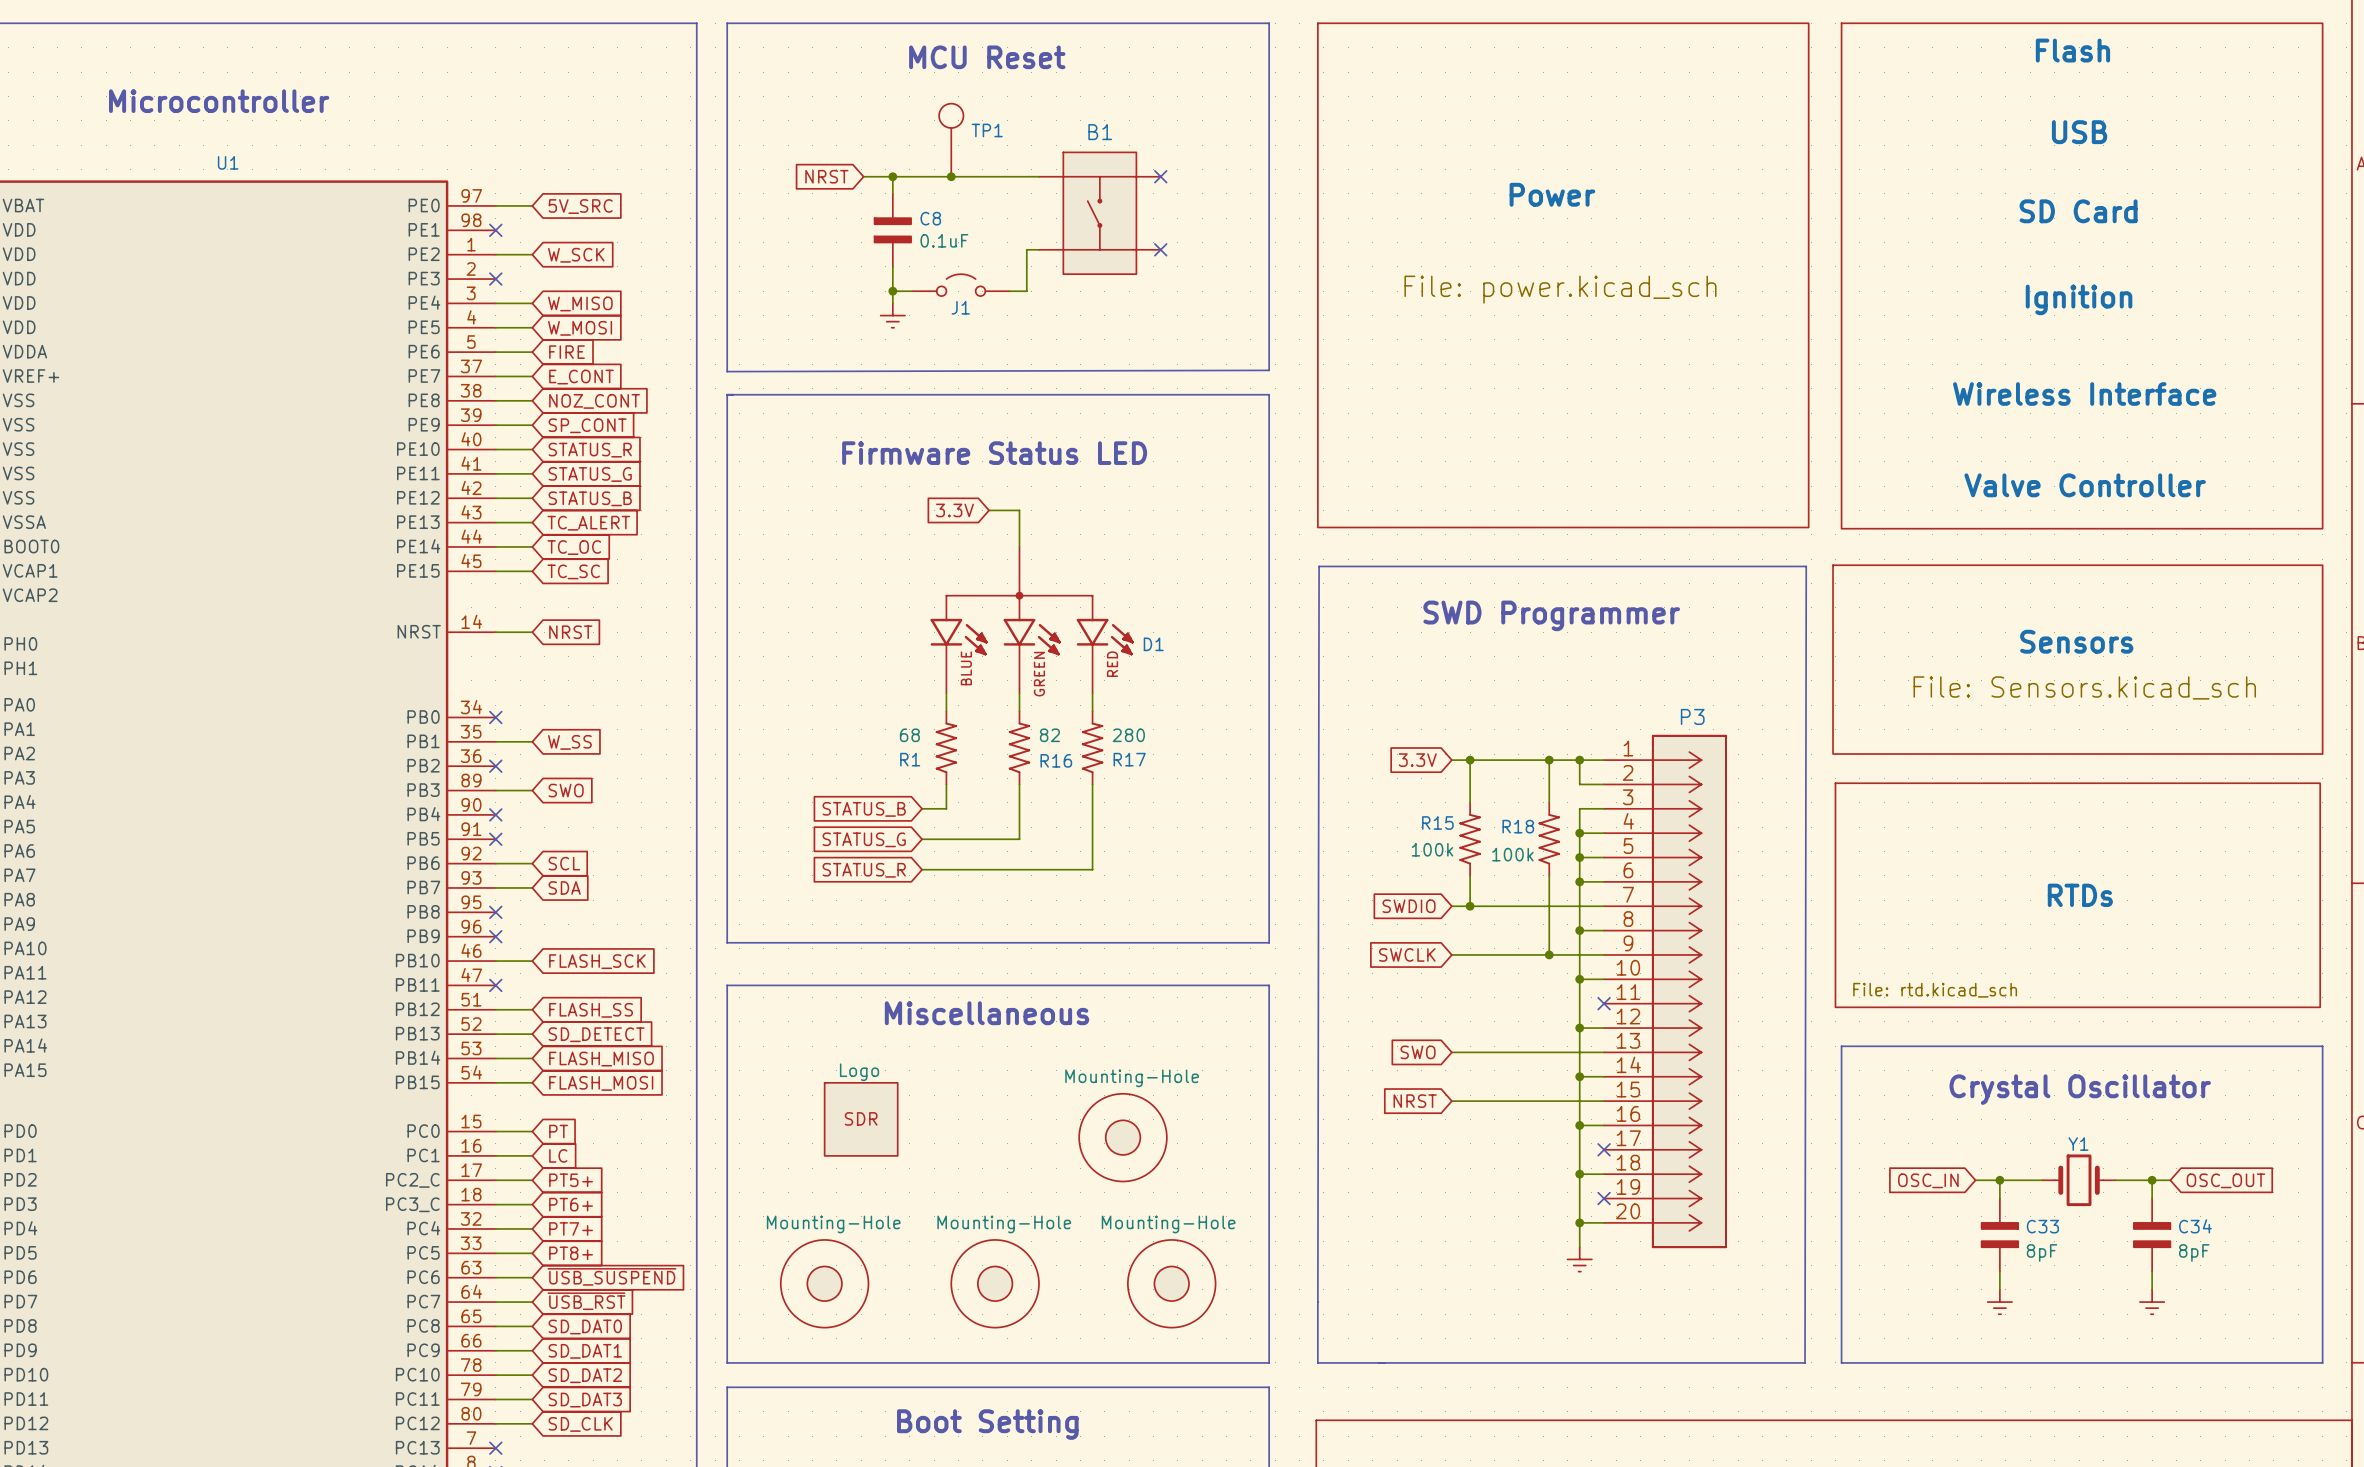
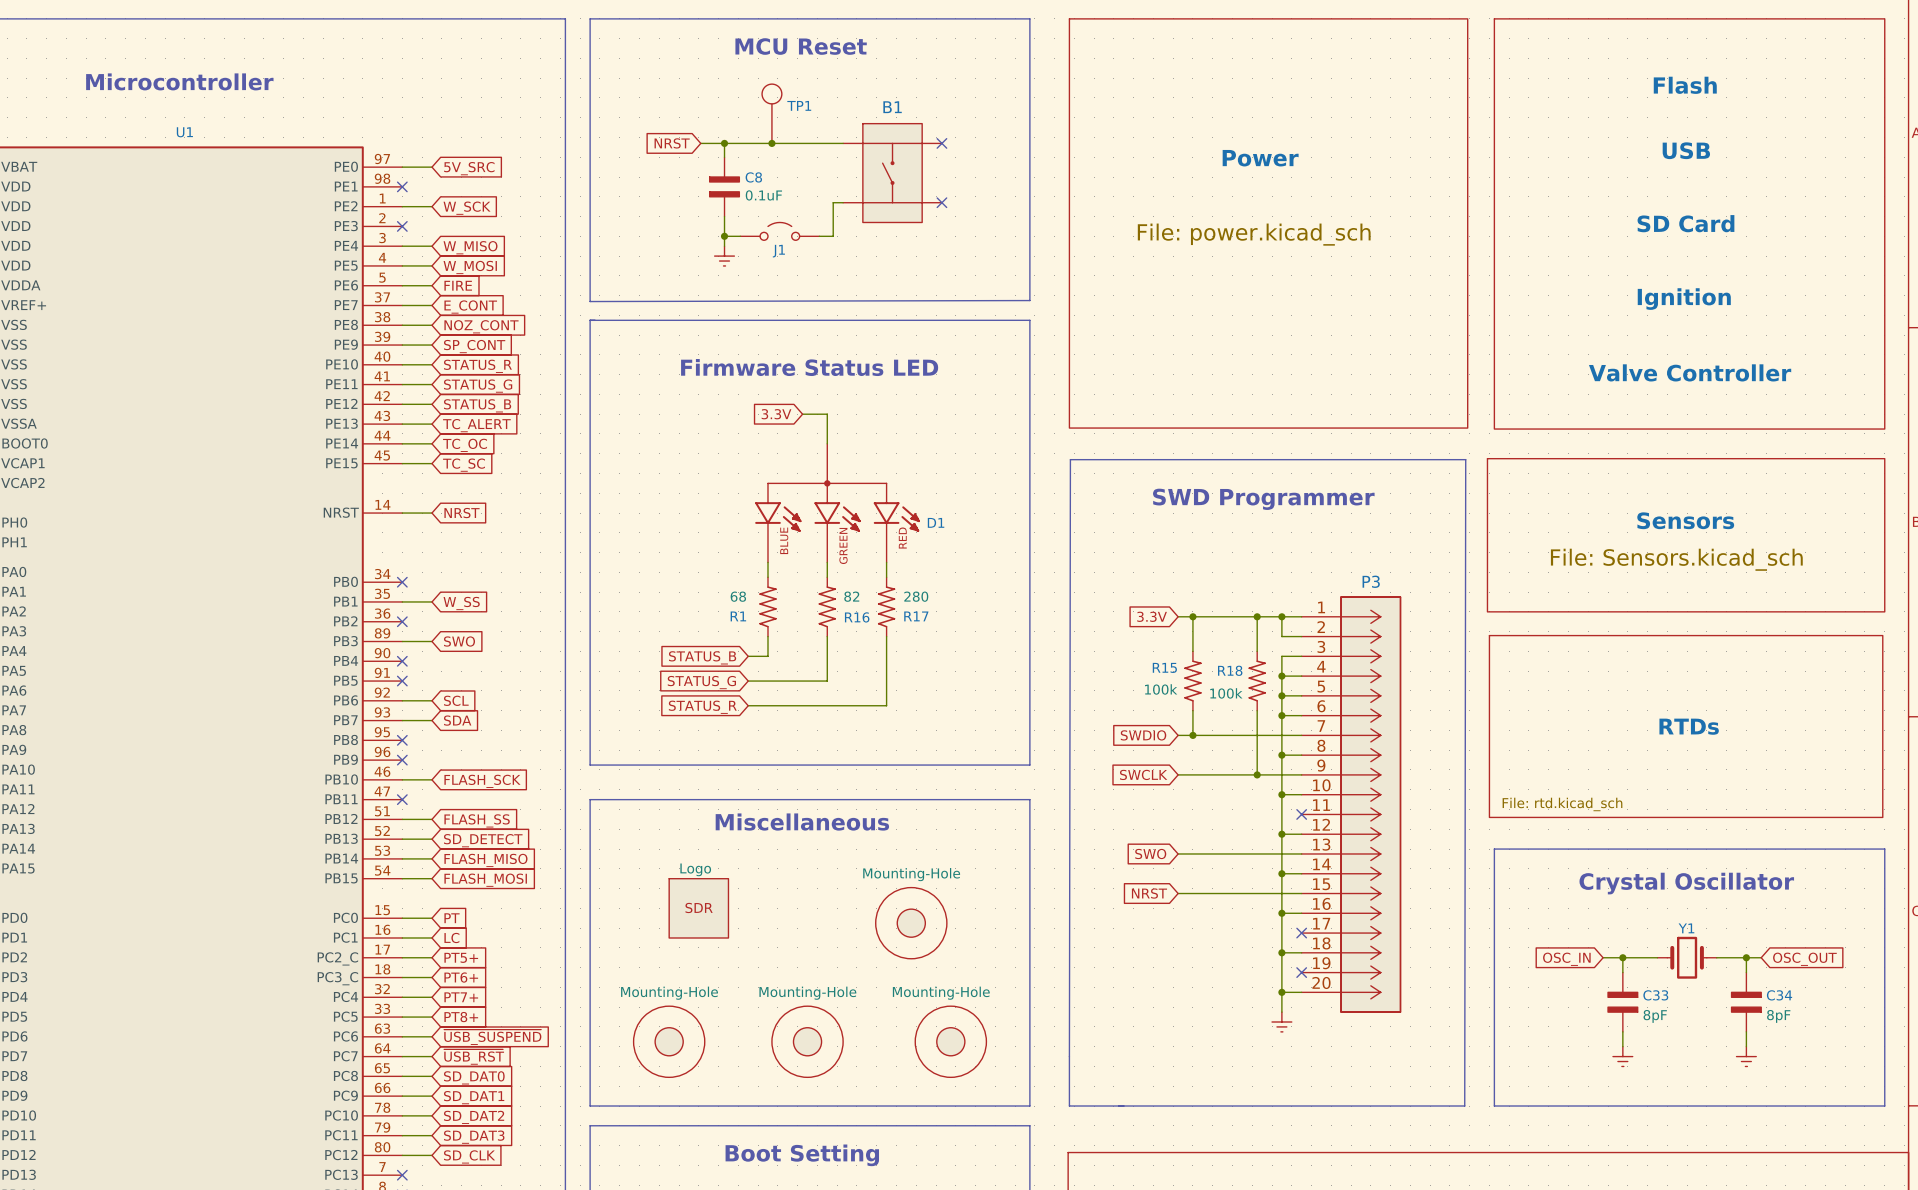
sheet text position: Flash (2072, 50) -> Flash (1685, 85)
sheet text position: USB (2079, 132) -> USB (1686, 150)
sheet text position: SD Card (2078, 211) -> SD Card (1685, 223)
sheet text position: Ignition (2079, 299) -> Ignition (1684, 299)
sheet text: Wireless Interface (2084, 394) -> none
sheet text position: Valve Controller (2085, 485) -> Valve Controller (1690, 372)

